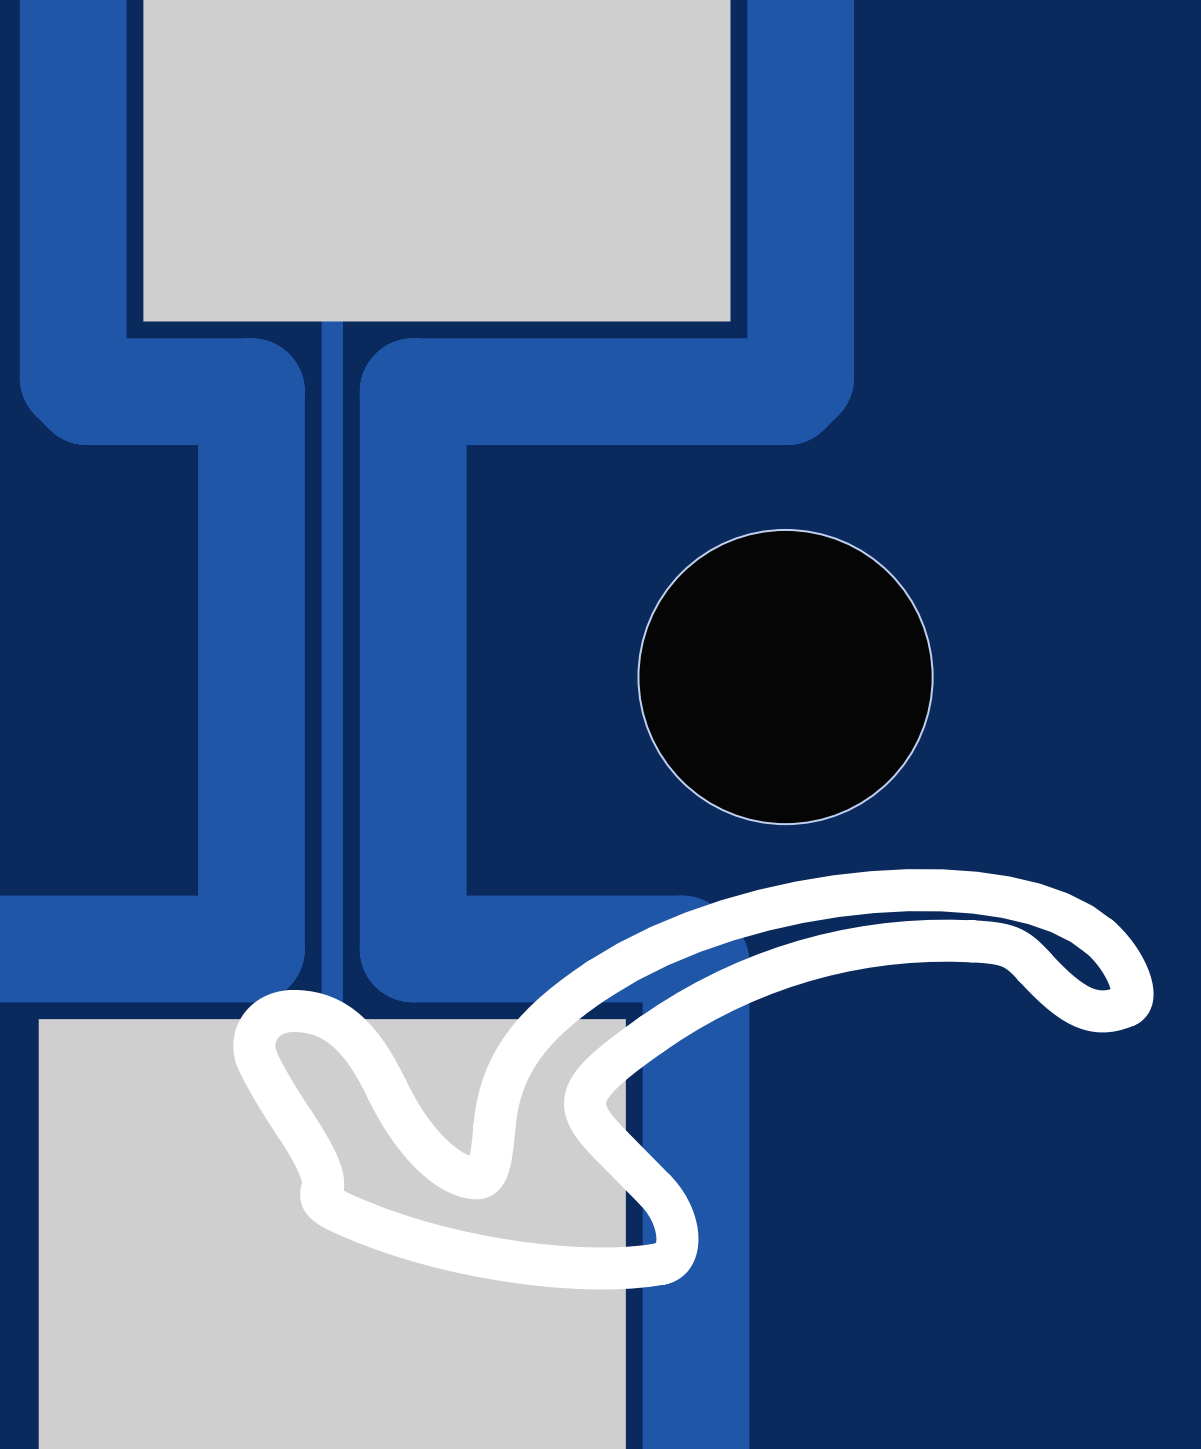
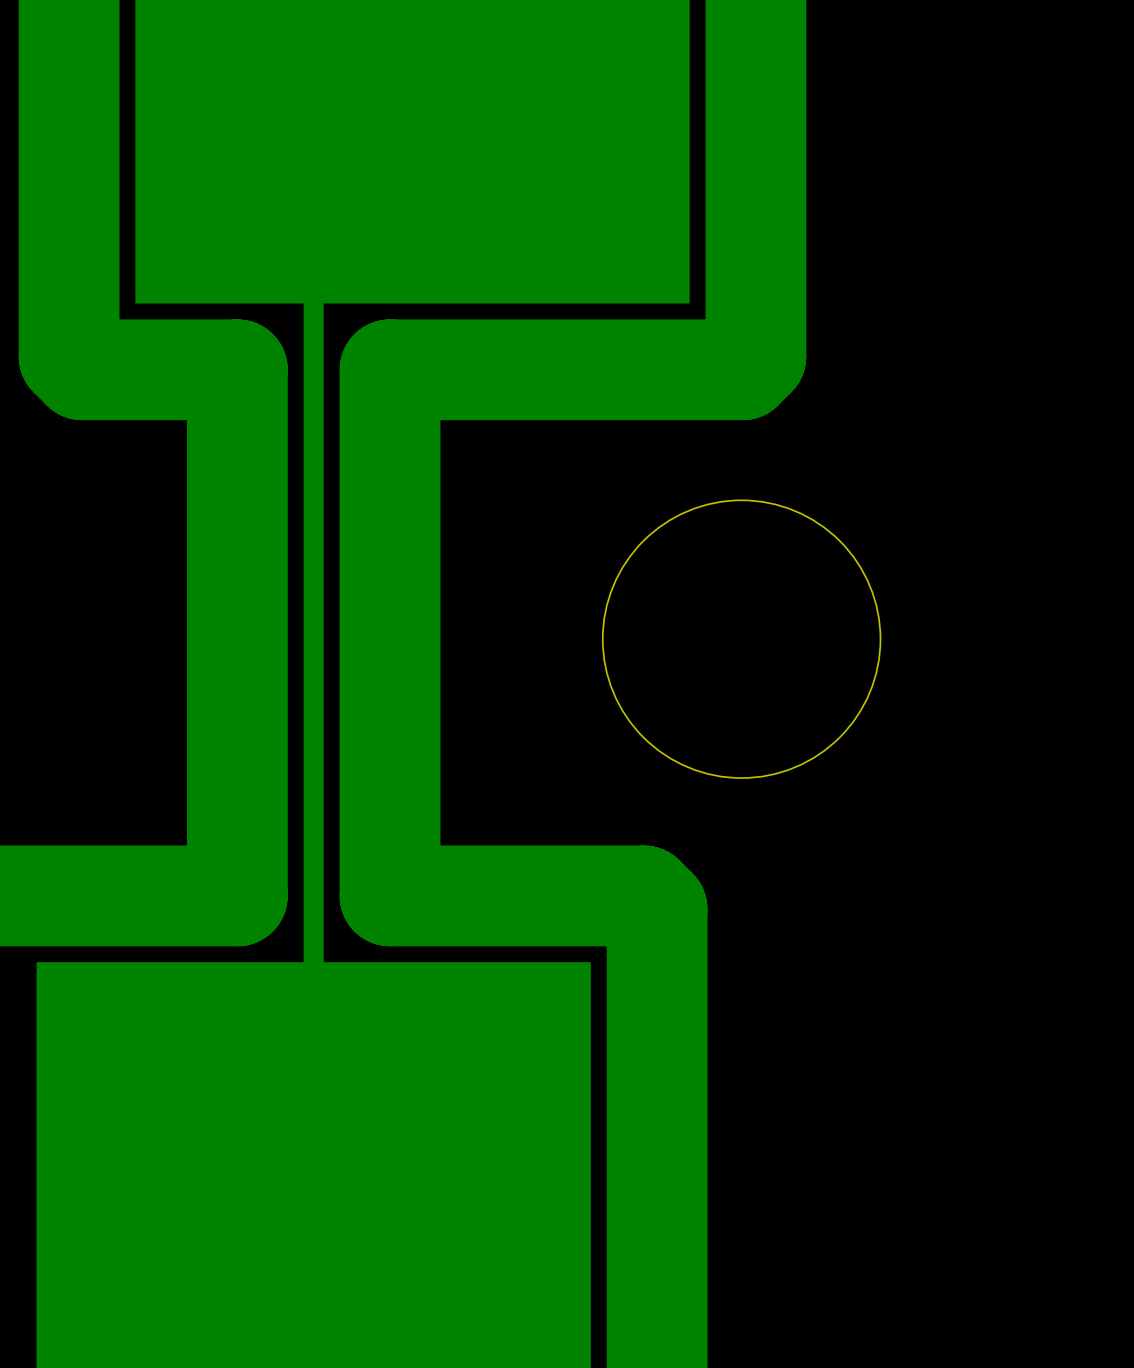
line: (1100, 937) (1121, 962) (1131, 987) (1130, 1001) (1126, 1005) (1115, 1009) (1094, 1010) (1078, 1004) (1054, 987) (1021, 954) (1006, 945) (972, 941) (908, 942) (845, 950) (804, 960) (764, 974) (706, 1000) (638, 1044) (607, 1068) (594, 1081) (586, 1093) (585, 1105) (588, 1116) (596, 1129) (660, 1195) (673, 1218) (677, 1240) (674, 1254) (665, 1262) (646, 1266) (577, 1267) (538, 1264) (479, 1255) (401, 1236) (332, 1208) (321, 1198) (322, 1178) (314, 1155) (269, 1083) (254, 1051) (254, 1042) (257, 1031) (264, 1021) (275, 1014) (288, 1011) (300, 1011) (321, 1015) (333, 1021) (350, 1034) (366, 1053) (402, 1117) (424, 1147) (442, 1164) (454, 1171) (465, 1176) (478, 1178) (484, 1174) (489, 1164) (497, 1106) (506, 1075) (521, 1048) (535, 1030) (563, 1005) (598, 979) (627, 961) (692, 932) (727, 920) (799, 902) (872, 892) (942, 890) (1005, 897) (1034, 903) (1059, 912) (1081, 923) (1100, 937) -> none

